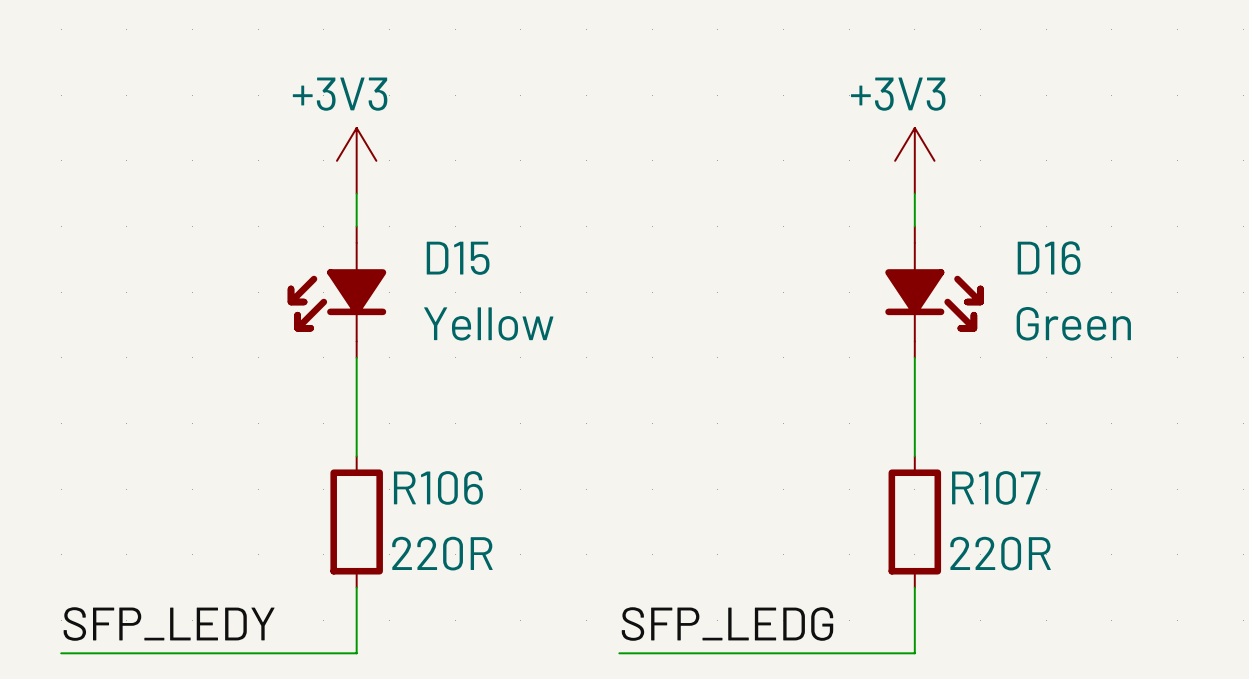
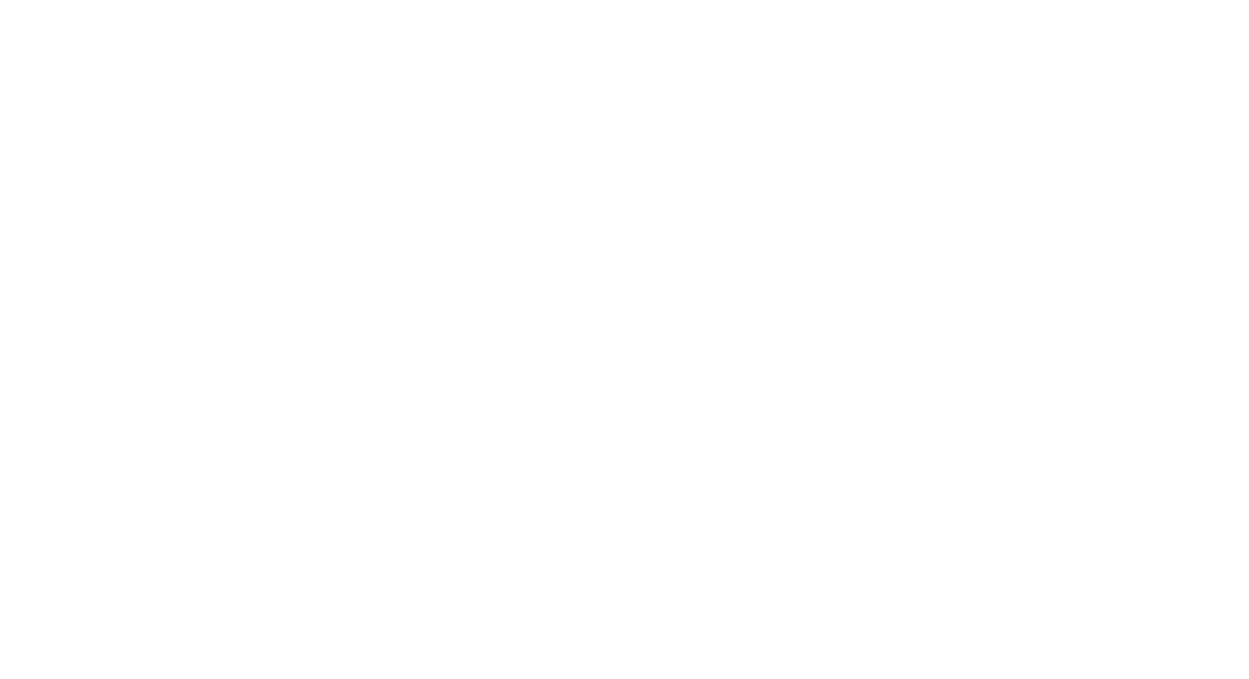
power symbol: +3V3 (356, 160) -> none
power symbol: +3V3 (914, 160) -> none
wire: (356, 193) (356, 226) -> none
wire: (914, 193) (914, 226) -> none
D15: (336, 292) -> none
D16: (934, 292) -> none
wire: (356, 357) (356, 456) -> none
wire: (914, 357) (914, 456) -> none
R106: (356, 521) -> none
R107: (914, 521) -> none
wire: (356, 587) (356, 653) (61, 653) -> none
wire: (914, 587) (914, 653) (619, 653) -> none
label: SFP_LEDY (169, 624) -> none
label: SFP_LEDG (727, 624) -> none

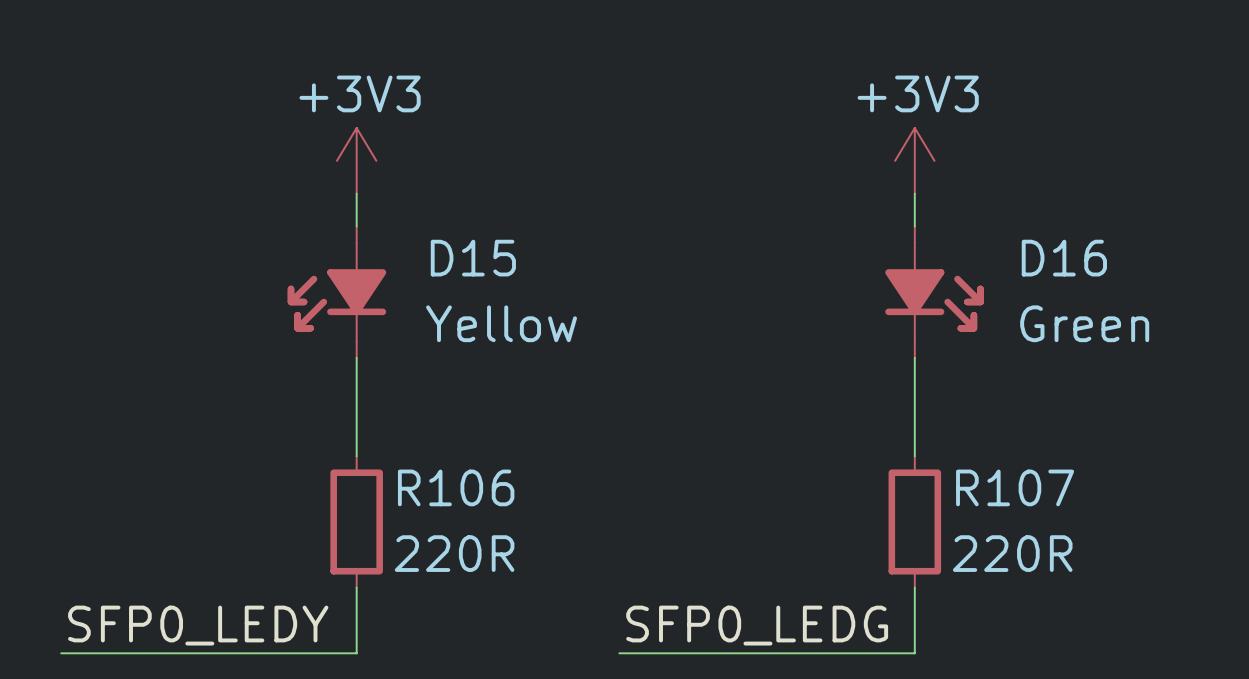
power symbol: none -> +3V3 (356, 160)
power symbol: none -> +3V3 (914, 160)
wire: none -> (356, 193) (356, 226)
wire: none -> (914, 193) (914, 226)
D15: none -> (336, 292)
D16: none -> (934, 292)
wire: none -> (356, 357) (356, 456)
wire: none -> (914, 357) (914, 456)
R106: none -> (356, 521)
R107: none -> (914, 521)
wire: none -> (356, 587) (356, 653) (61, 653)
wire: none -> (914, 587) (914, 653) (619, 653)
label: none -> SFP0_LEDY (198, 625)
label: none -> SFP0_LEDG (757, 625)

